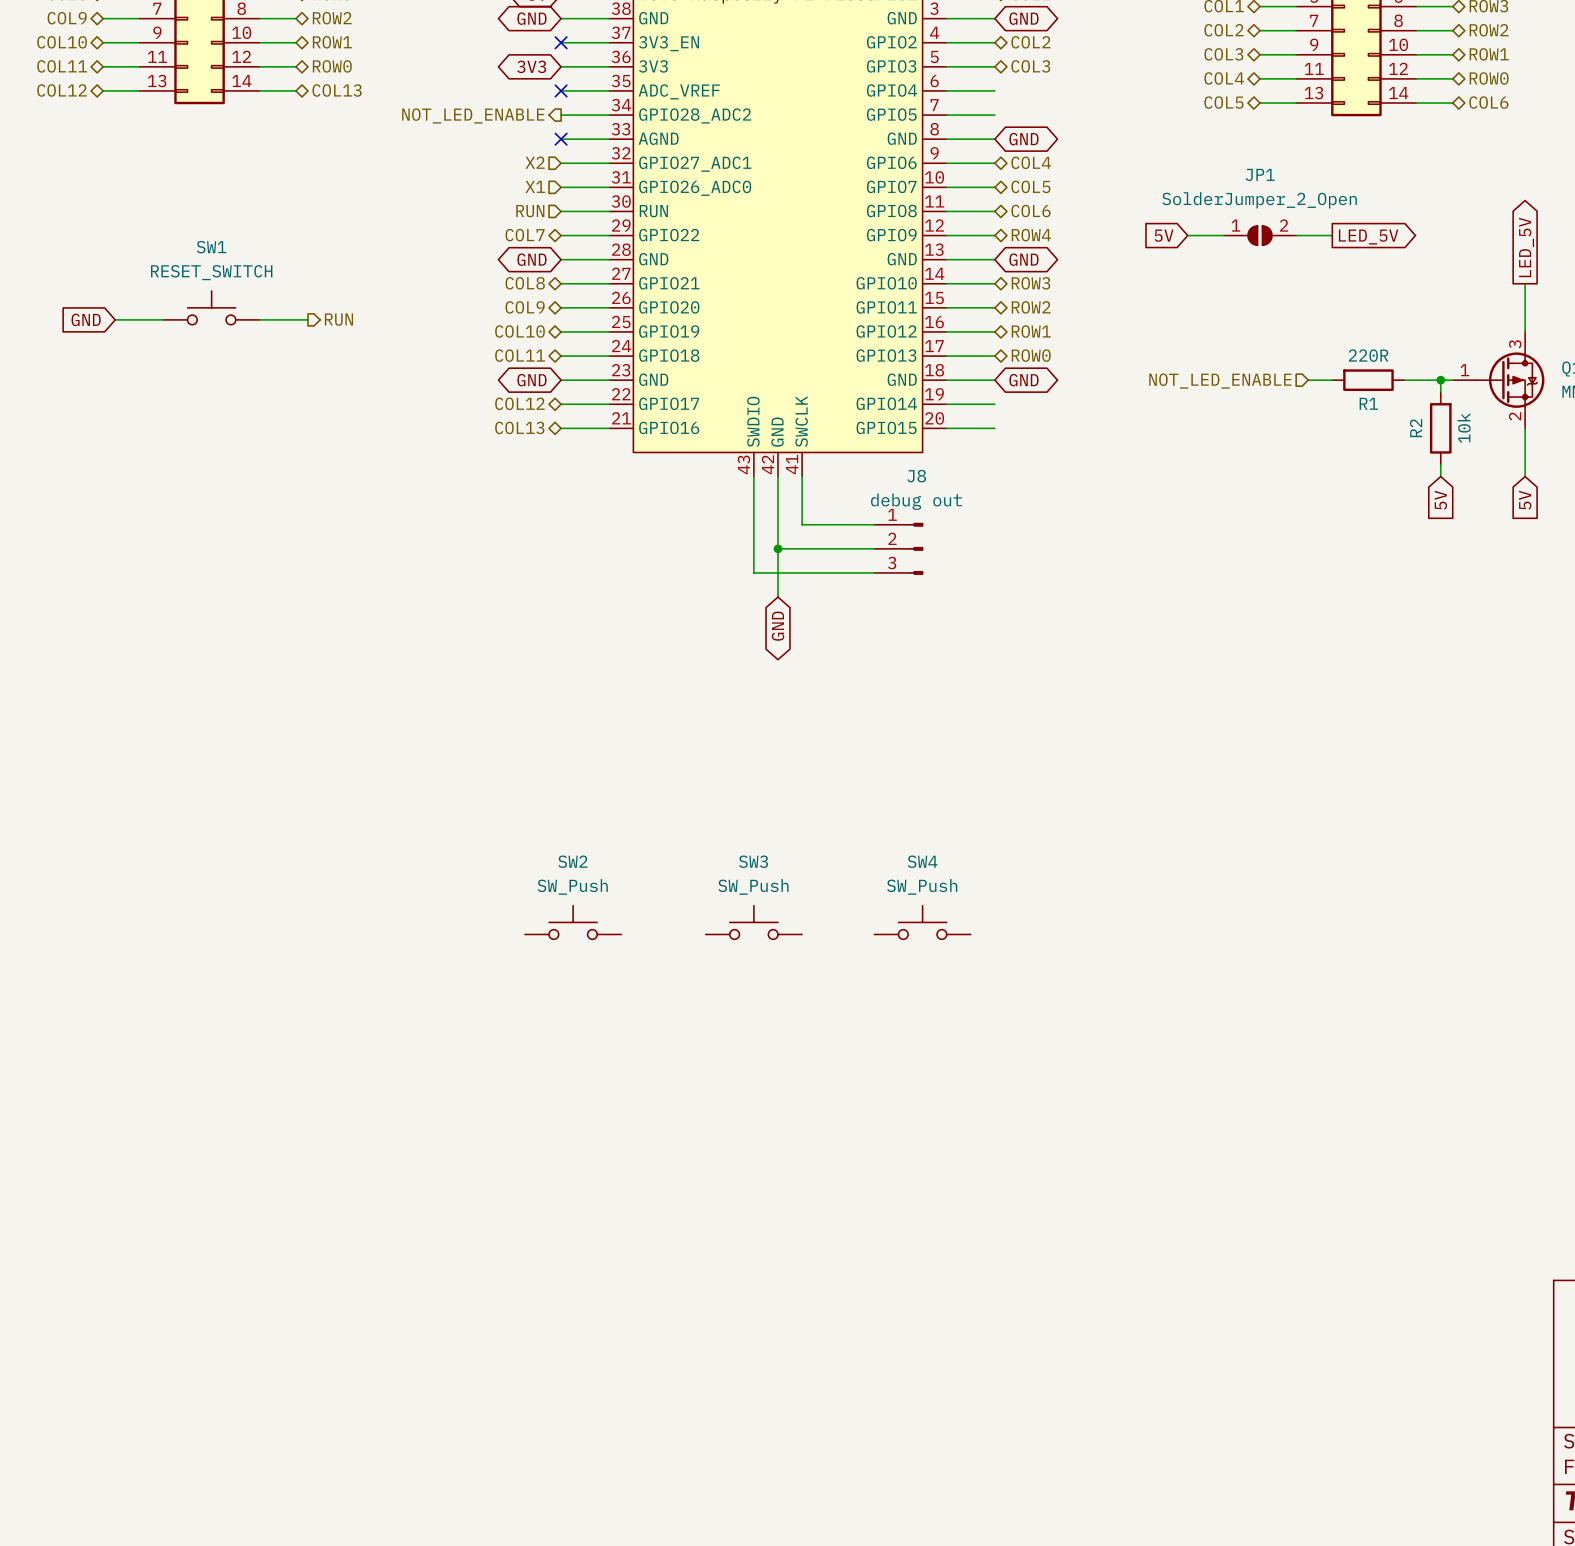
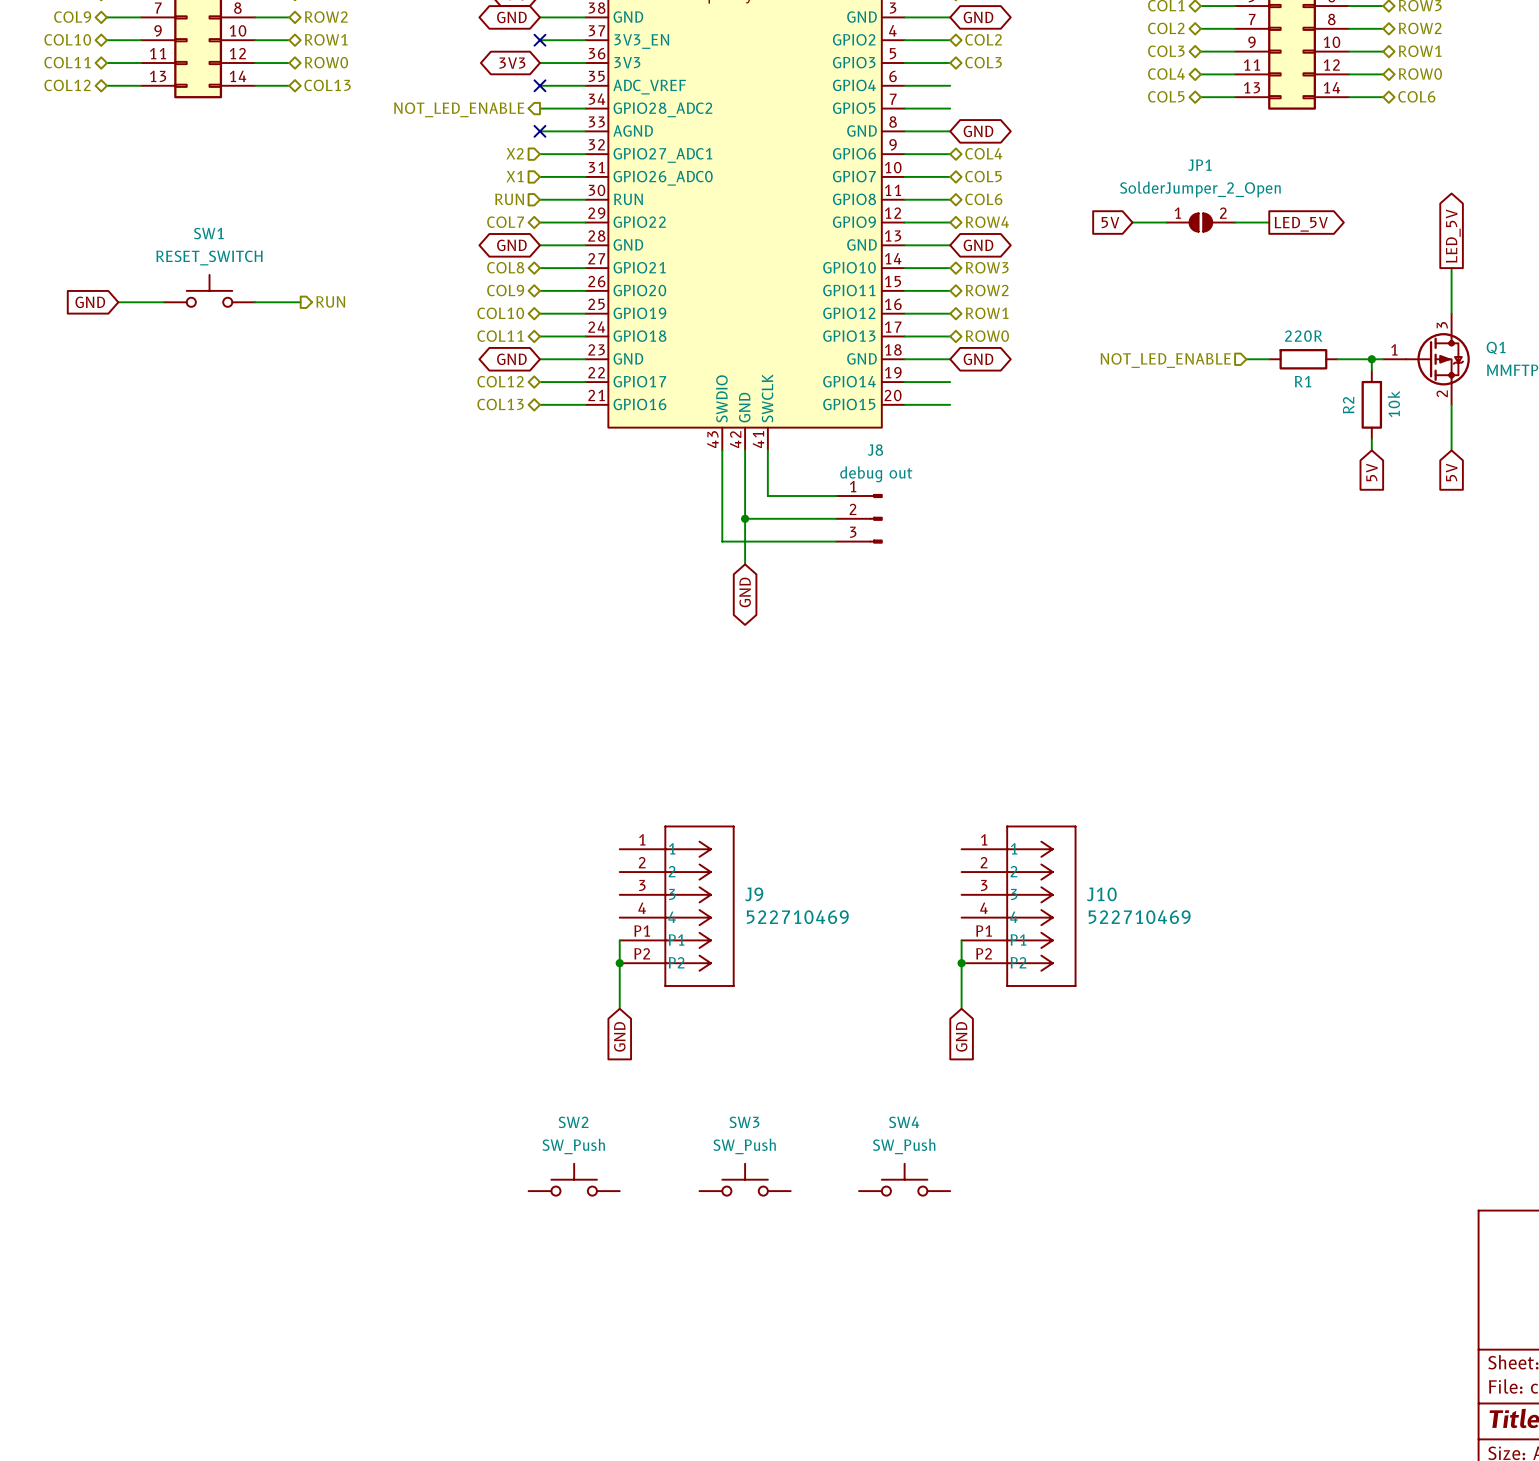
SW2 position: (573, 922) -> (574, 1179)
SW3 position: (753, 922) -> (745, 1179)
SW4 position: (922, 922) -> (904, 1179)
J9: none -> 522710469 (677, 906)
J10: none -> 522710469 (1018, 906)
wire: none -> (619, 940) (619, 1008)
wire: none -> (961, 940) (961, 1008)
junction: none -> (619, 963)
junction: none -> (961, 963)
global label: none -> GND (619, 1036)
global label: none -> GND (961, 1036)

